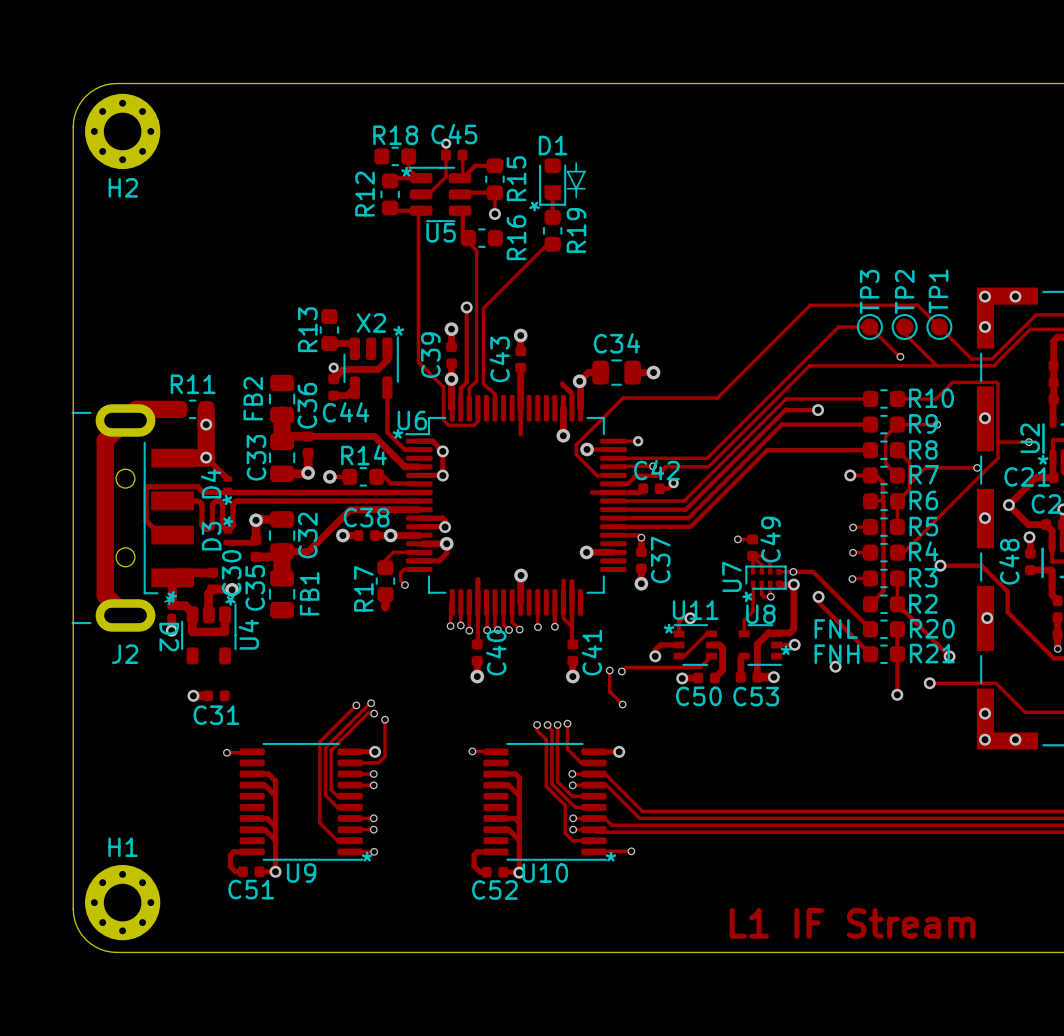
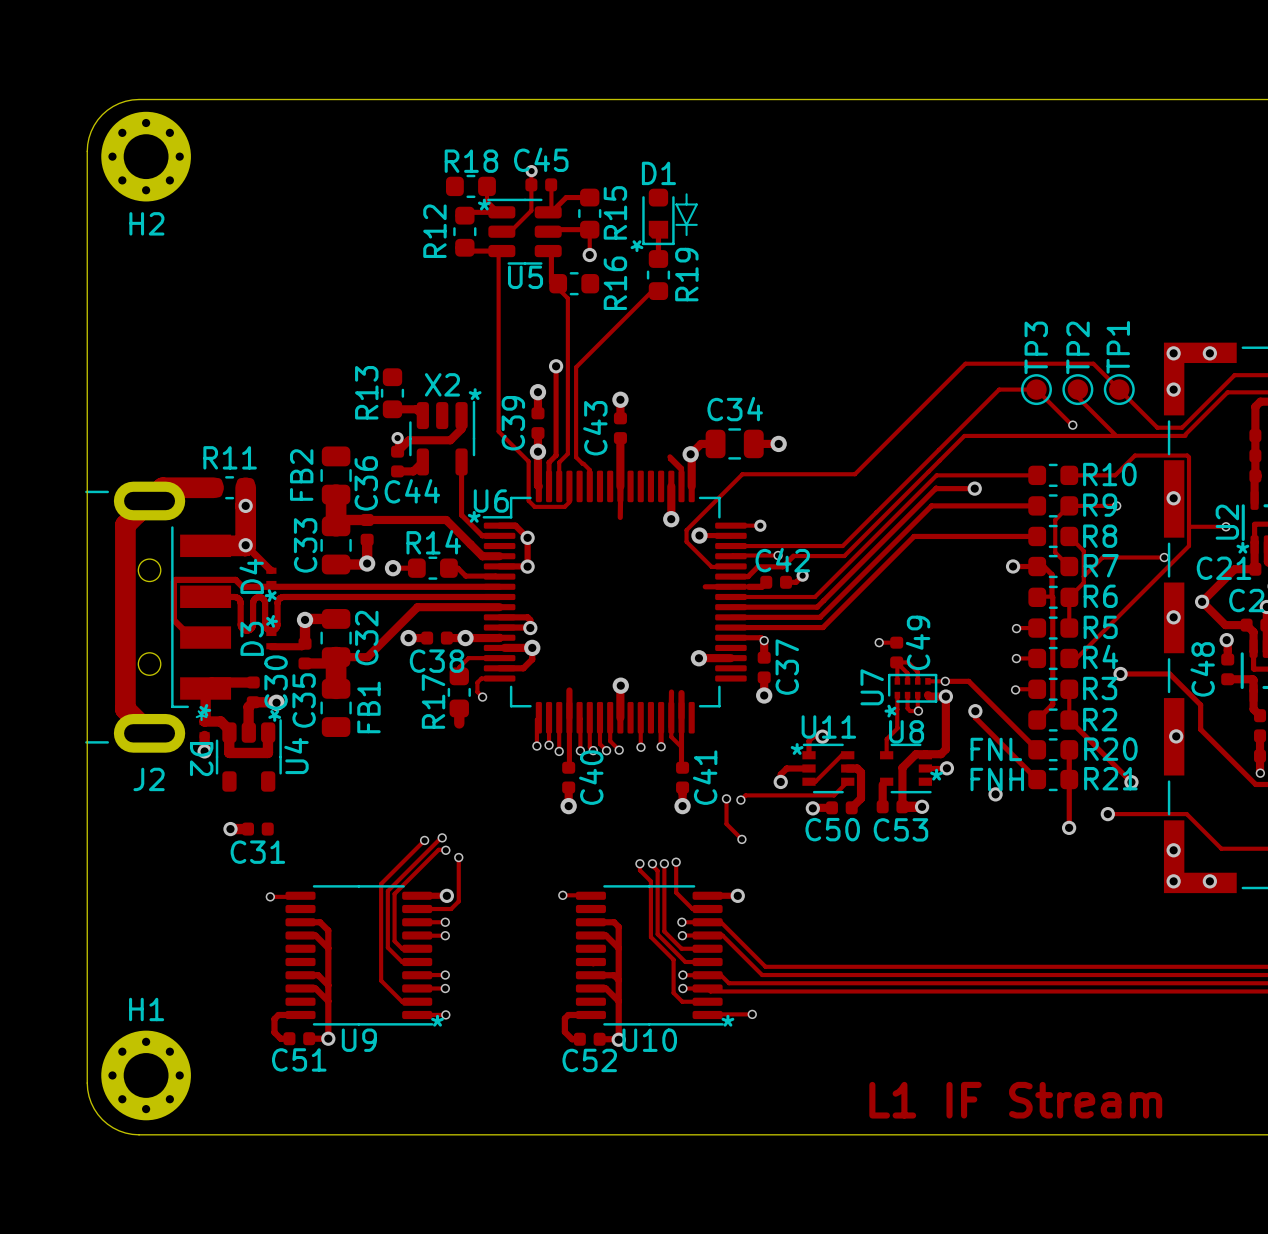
C38 name position: C38 (366, 517) -> C38 (437, 661)

